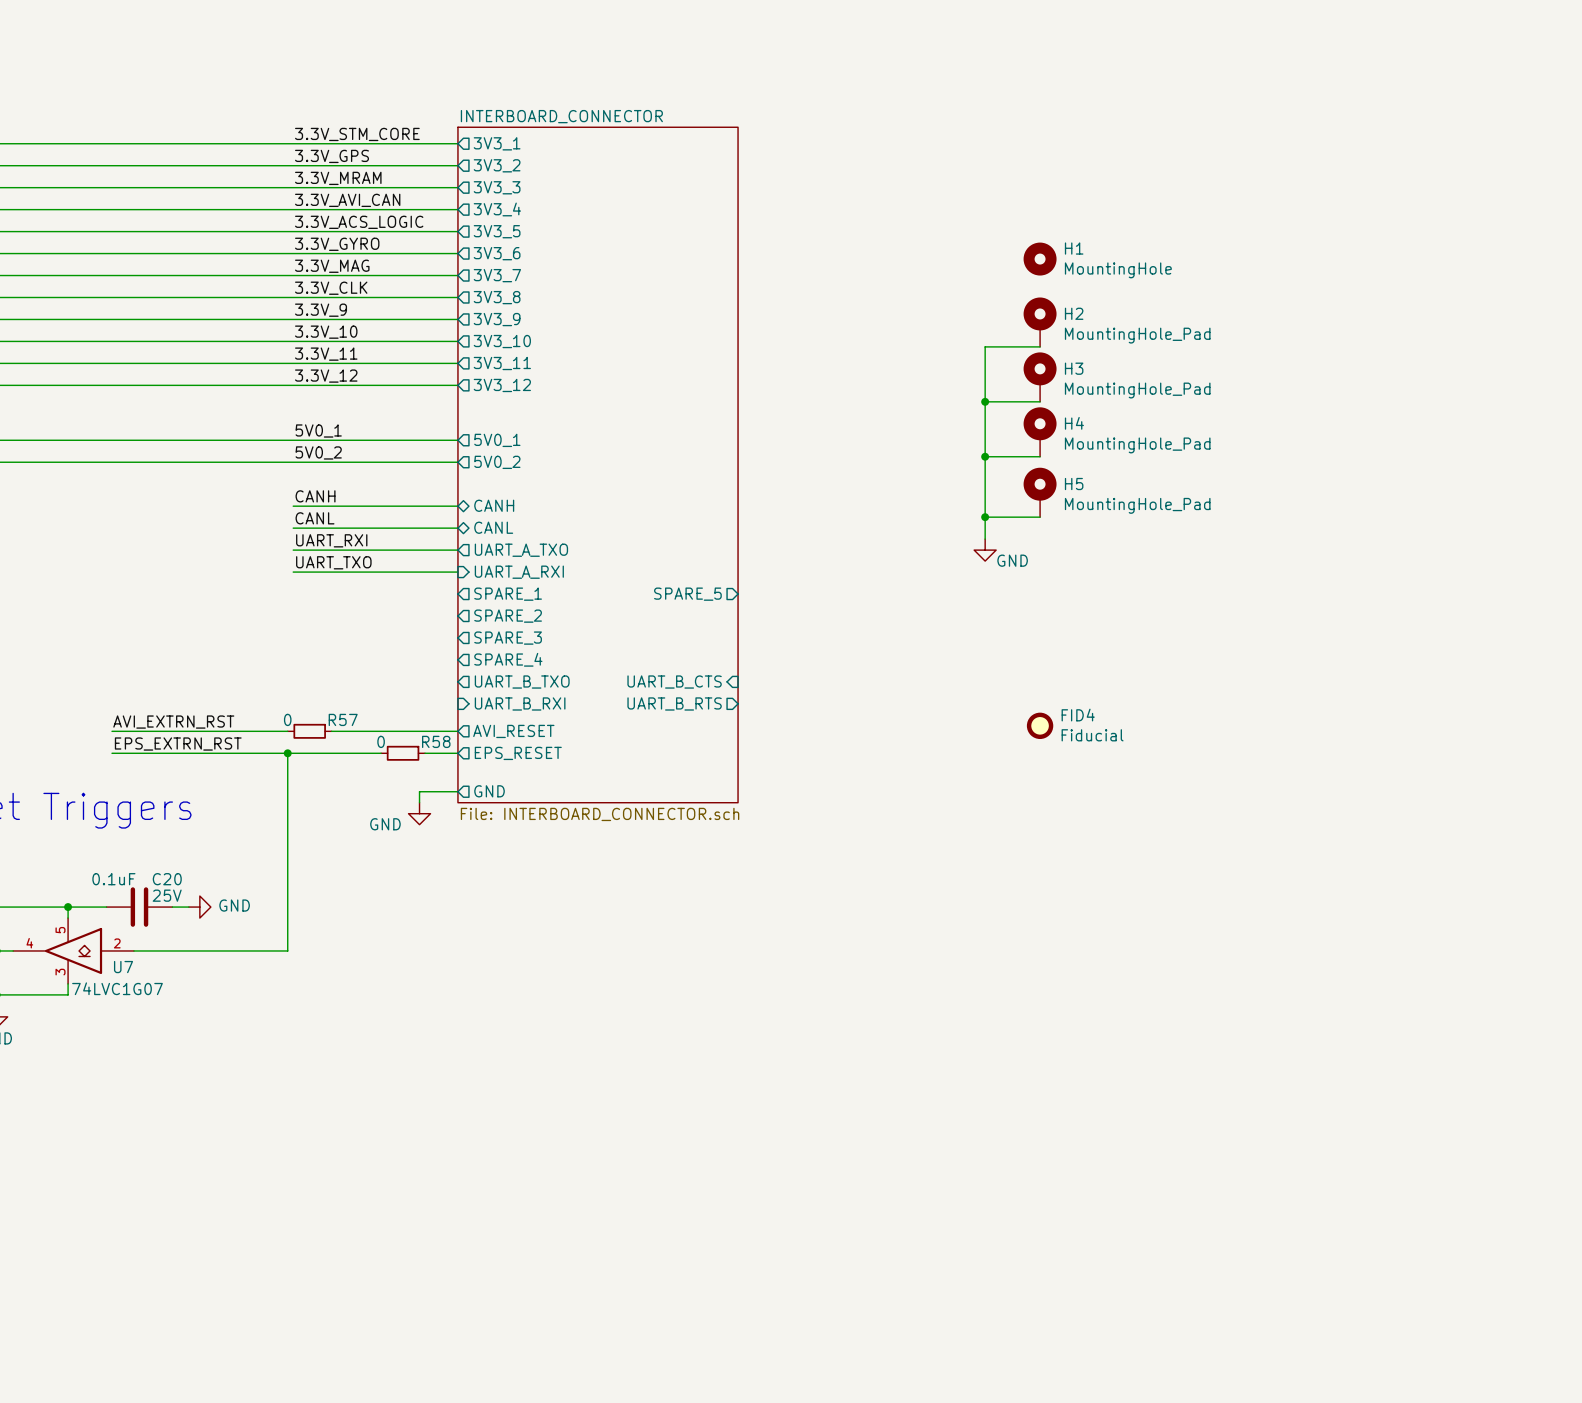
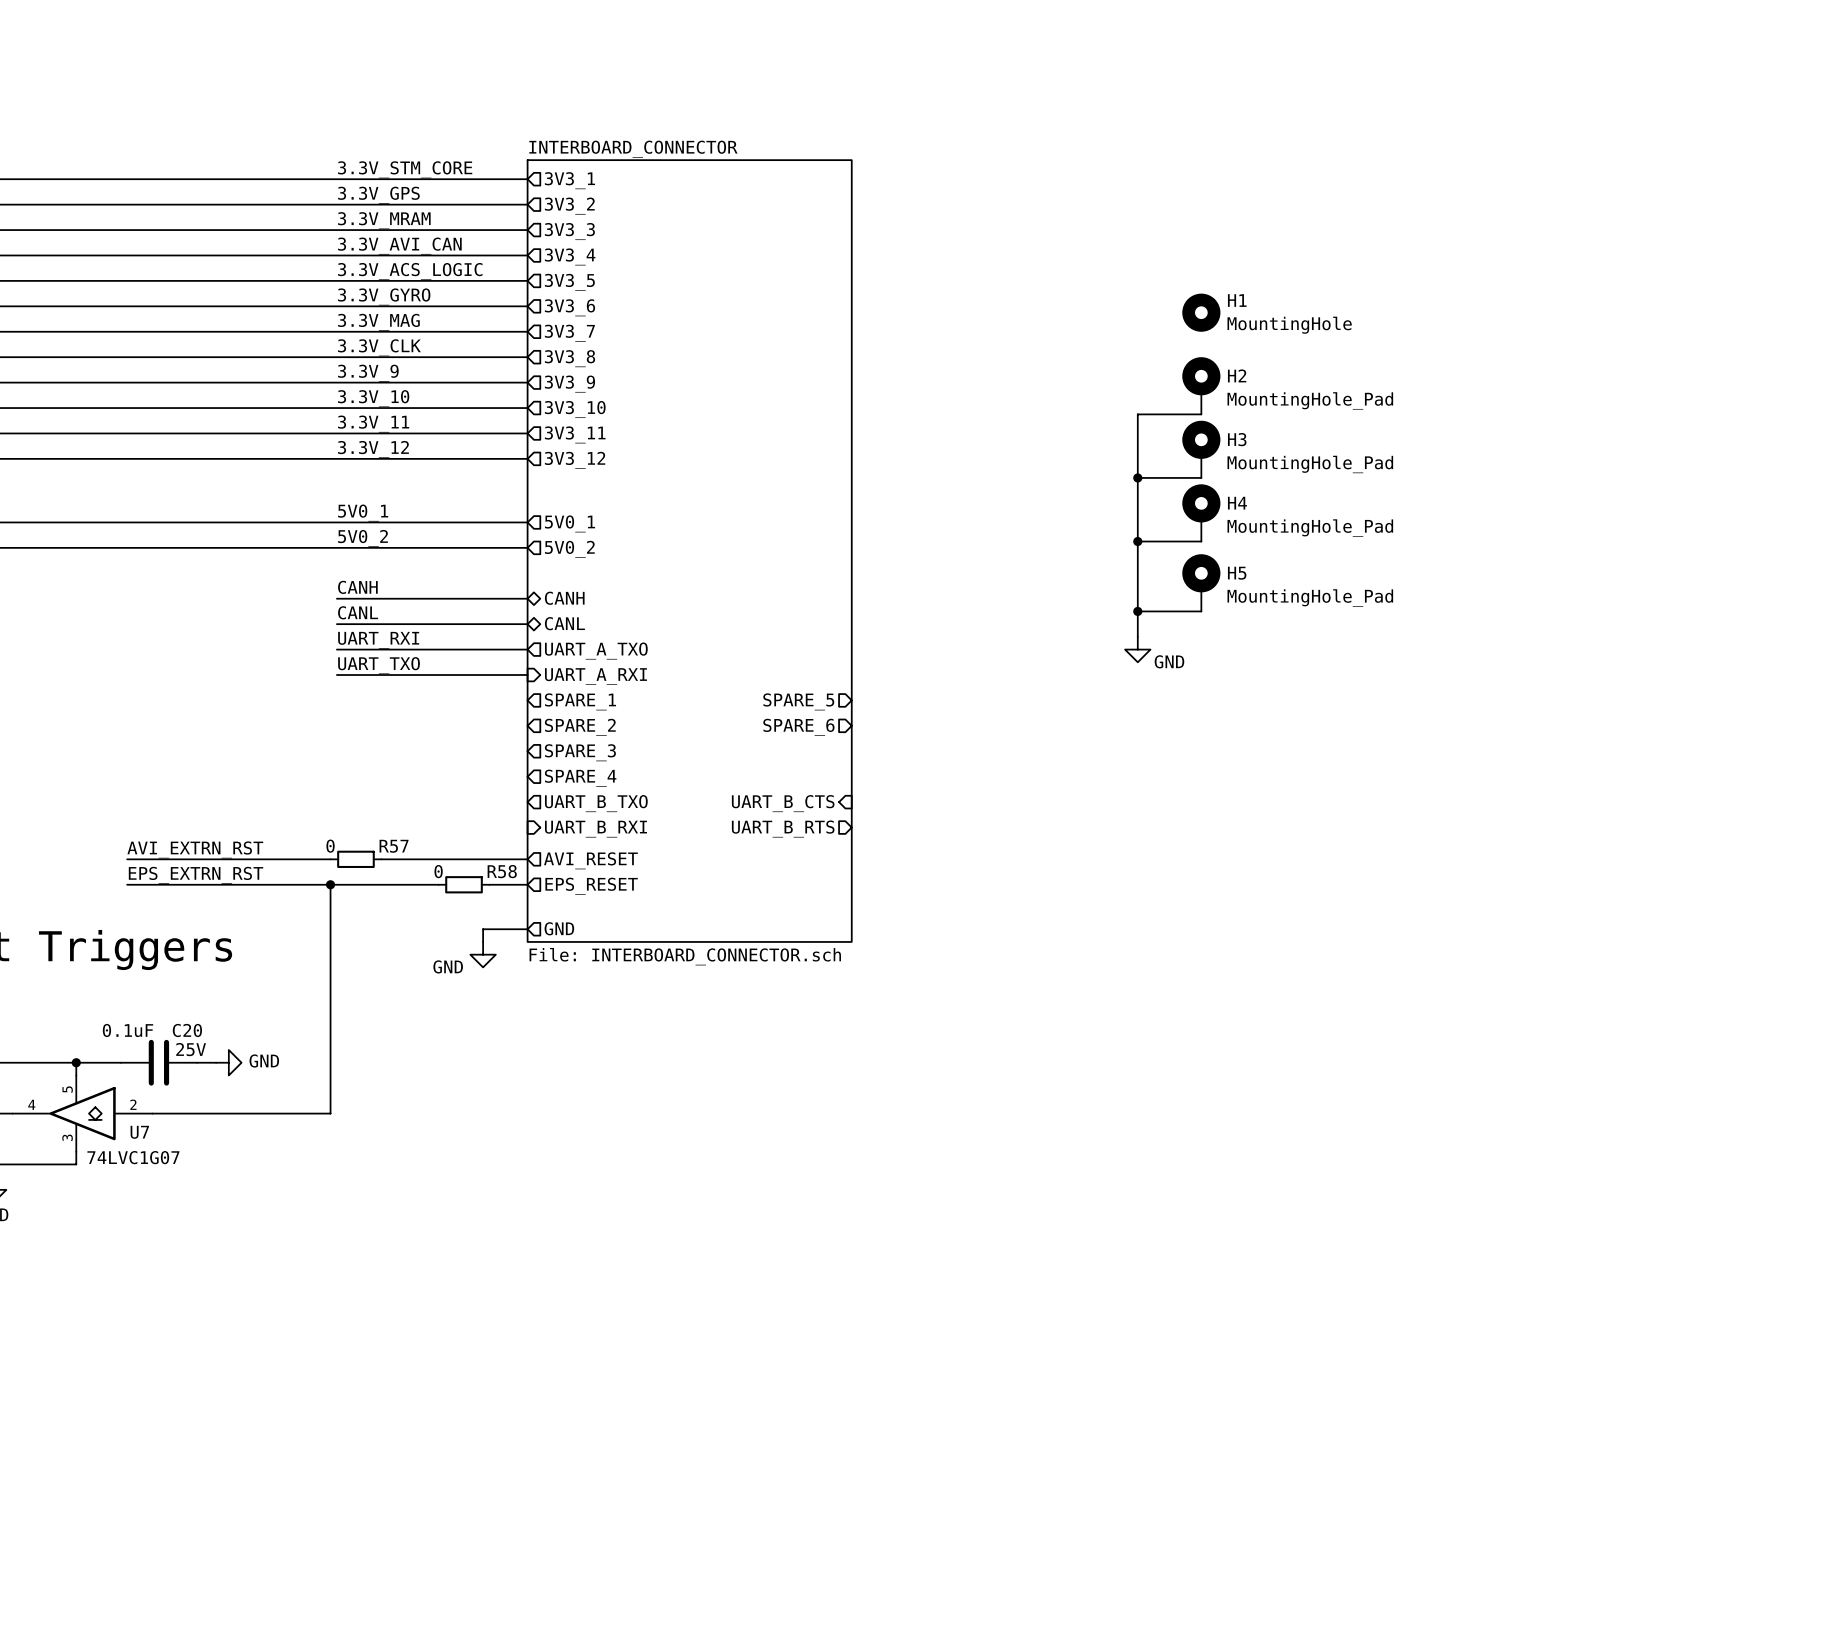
sheet pin: none -> SPARE_6 (798, 727)
FID4: Fiducial (1040, 725) -> none

